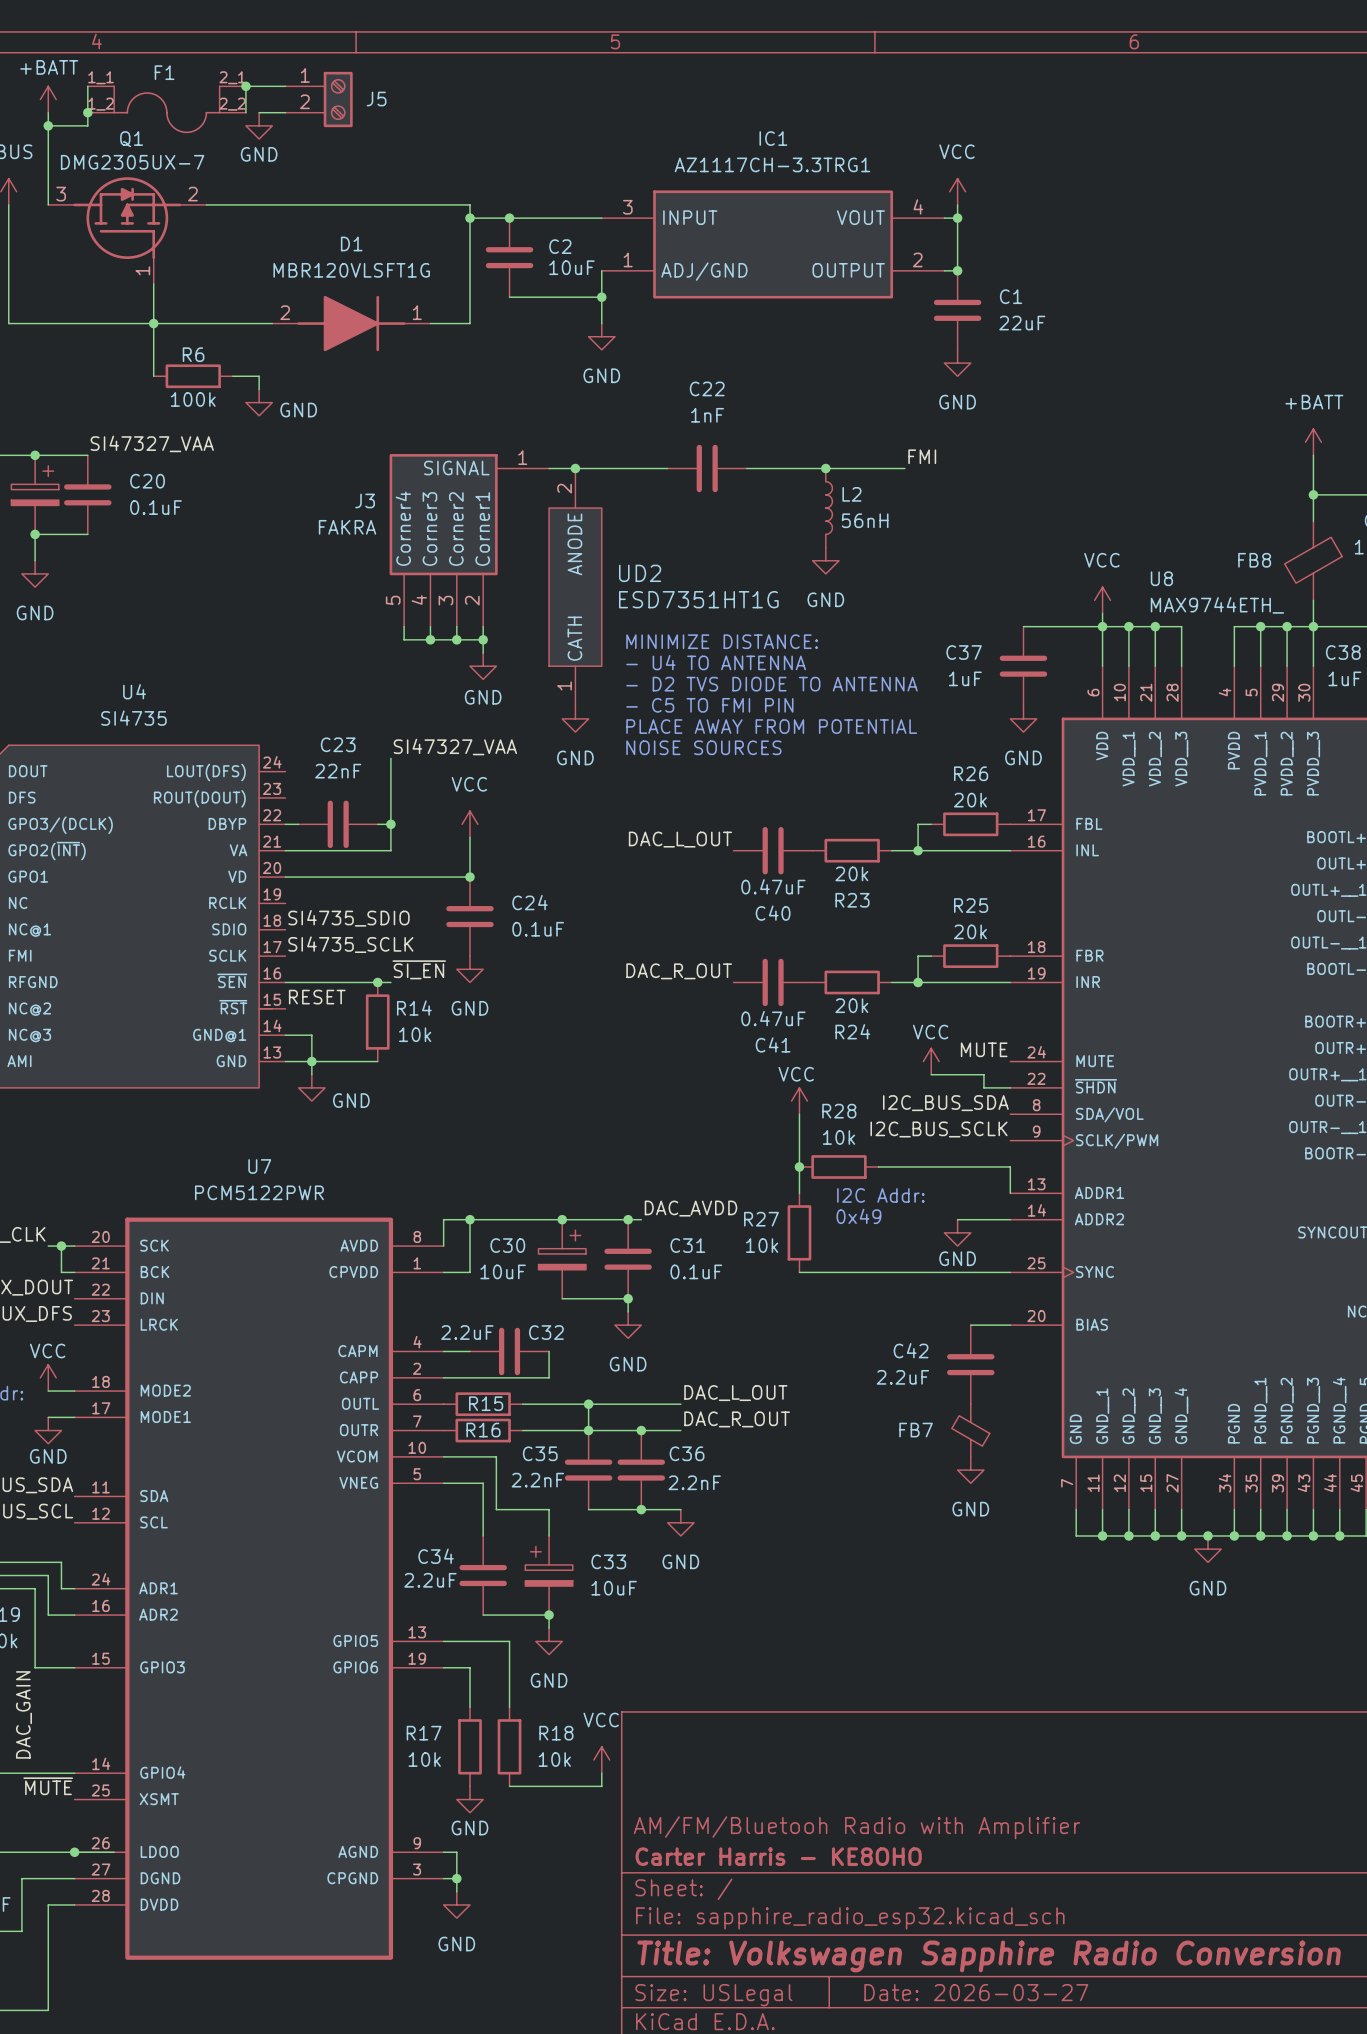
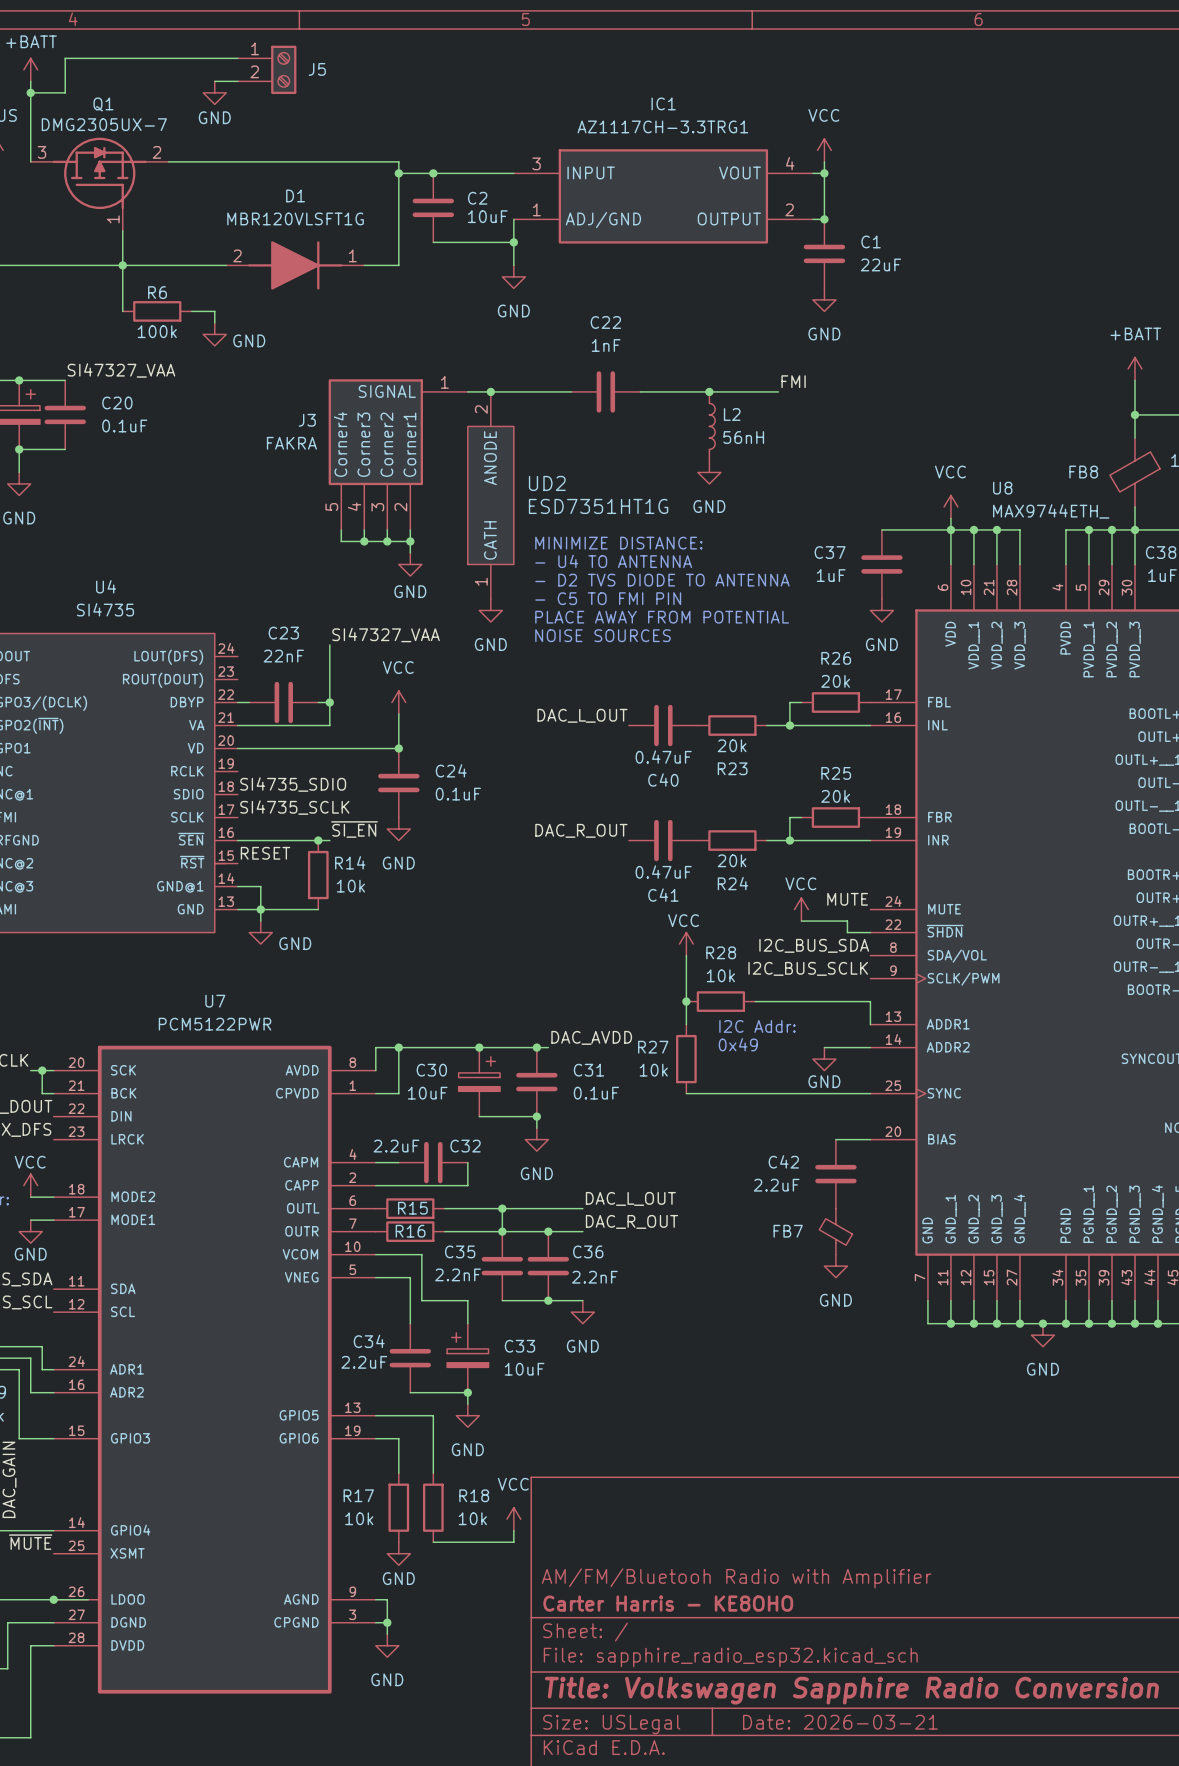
wire: (245, 86) (245, 112) -> (203, 58) (65, 58)
junction: (245, 86) -> none
F1: (166, 109) -> none
junction: (87, 112) -> none
title block: Date: 2026-03-27 (976, 1992) -> Date: 2026-03-21 (840, 1722)

